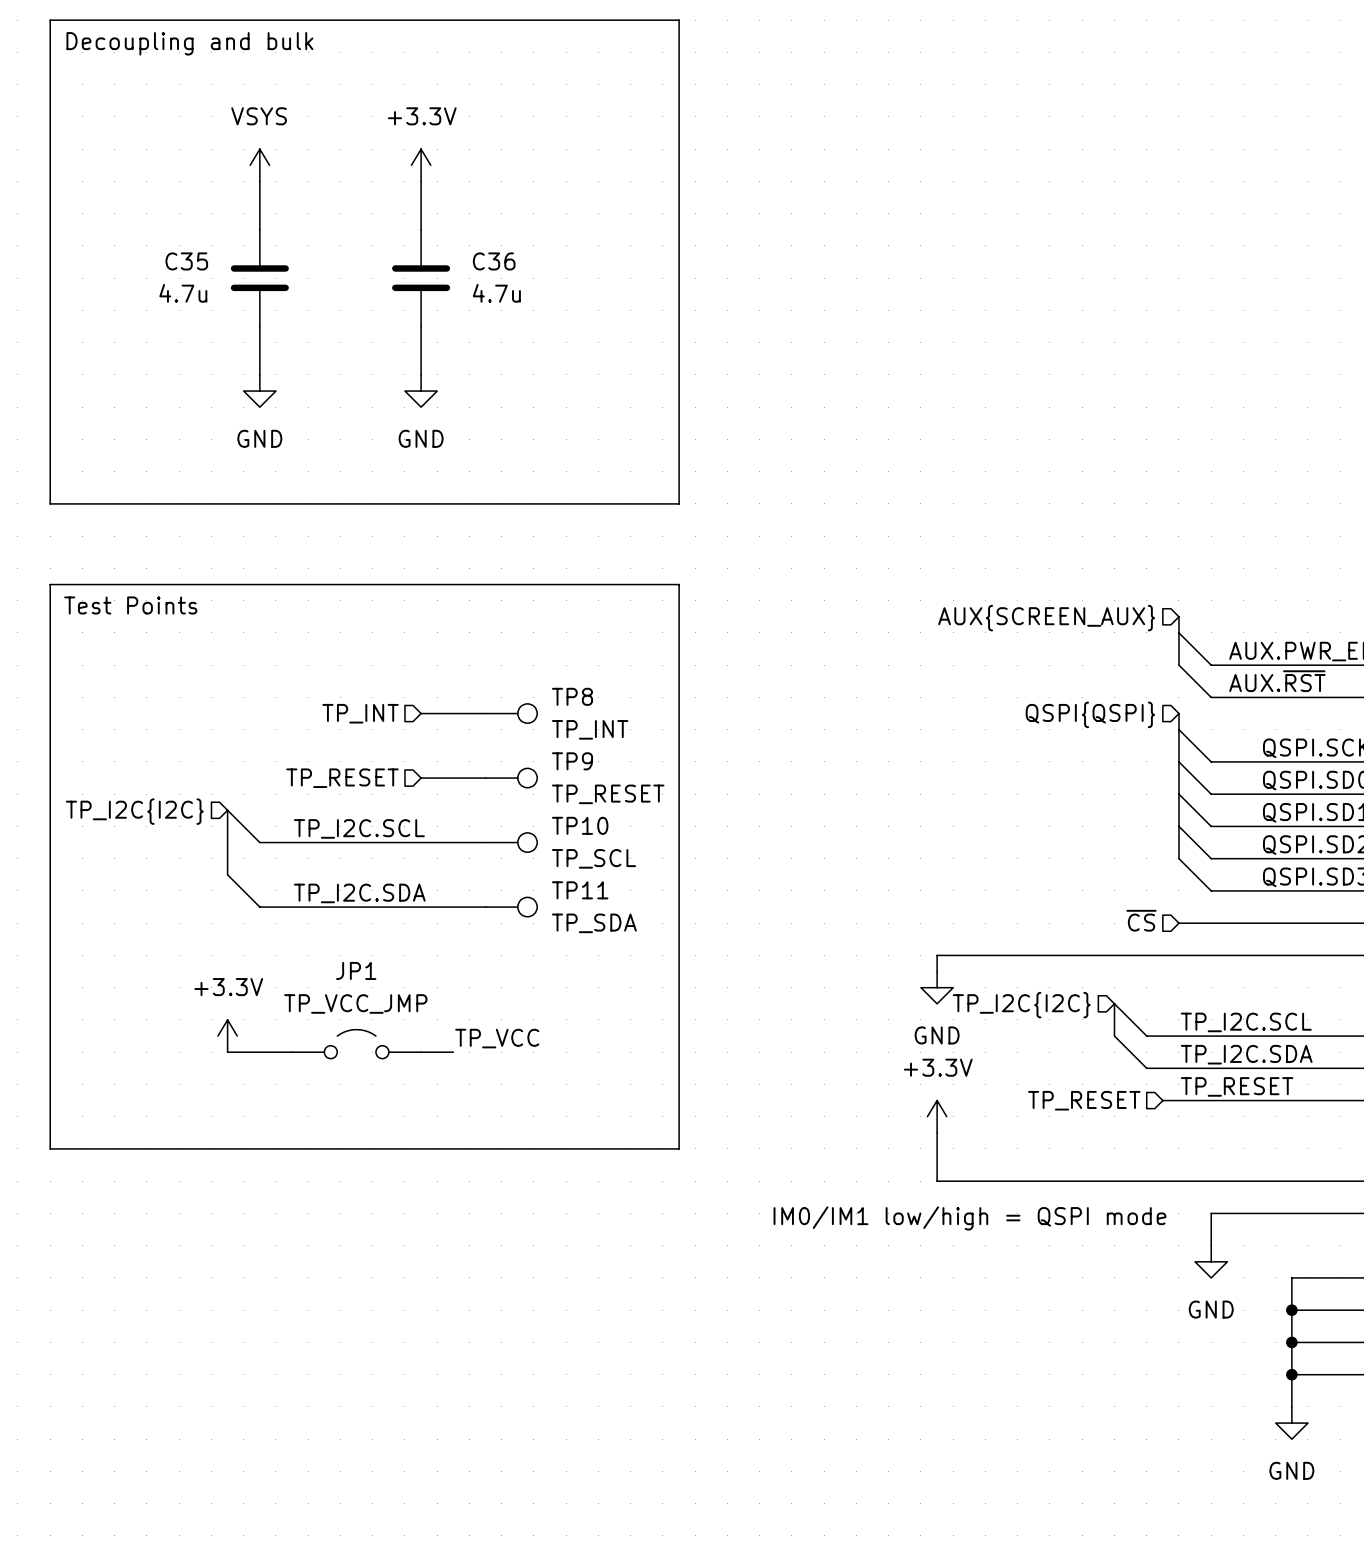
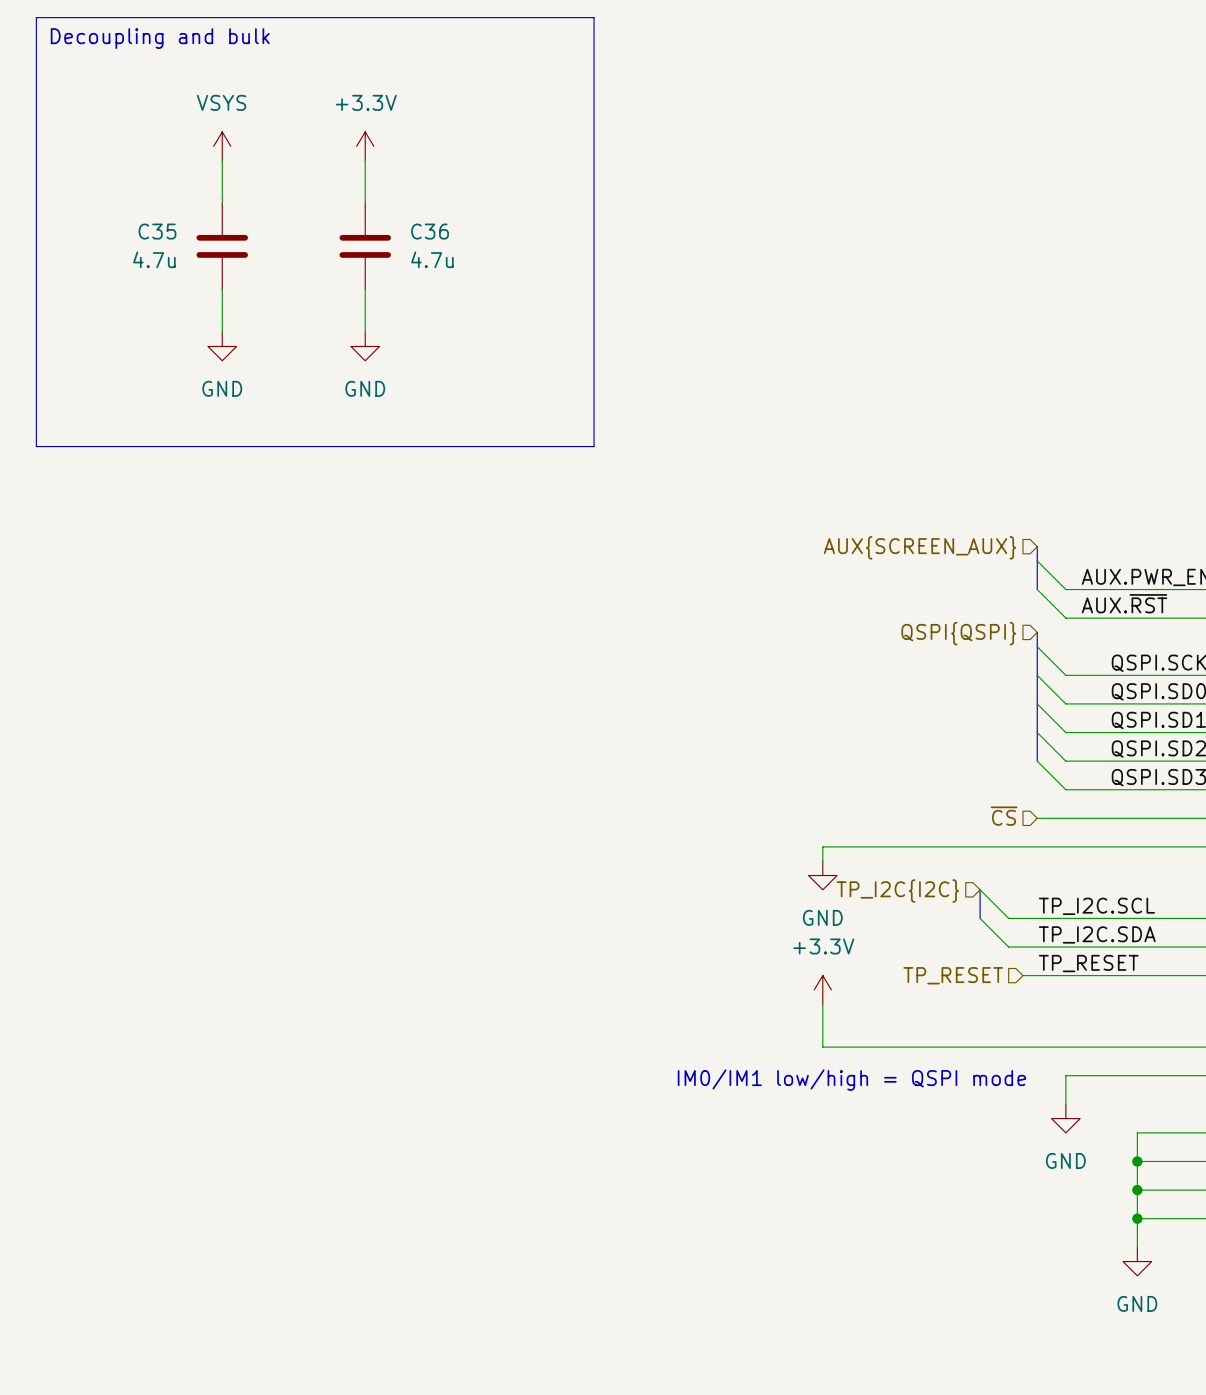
line: (50, 584) (679, 584) (679, 1148) (50, 1148) (50, 584) -> none
text: Test Points (130, 605) -> none
hierarchical label: TP_INT (360, 713) -> none
wire: (421, 713) (485, 713) -> none
TP8: TP_INT (511, 713) -> none
hierarchical label: TP_RESET (342, 778) -> none
wire: (421, 778) (485, 778) -> none
TP9: TP_RESET (511, 778) -> none
wire: (227, 810) (259, 842) (485, 842) -> none
bus: (227, 810) (227, 874) -> none
hierarchical label: TP_I2C{I2C} (134, 811) -> none
label: TP_I2C.SCL (359, 828) -> none
TP10: TP_SCL (511, 842) -> none
wire: (227, 874) (259, 907) (485, 907) -> none
label: TP_I2C.SDA (359, 893) -> none
TP11: TP_SDA (511, 907) -> none
power symbol: +3.3V (227, 1036) -> none
label: TP_VCC (497, 1038) -> none
JP1: TP_VCC_JMP (356, 1044) -> none
wire: (227, 1052) (292, 1052) -> none
wire: (421, 1052) (453, 1052) -> none

